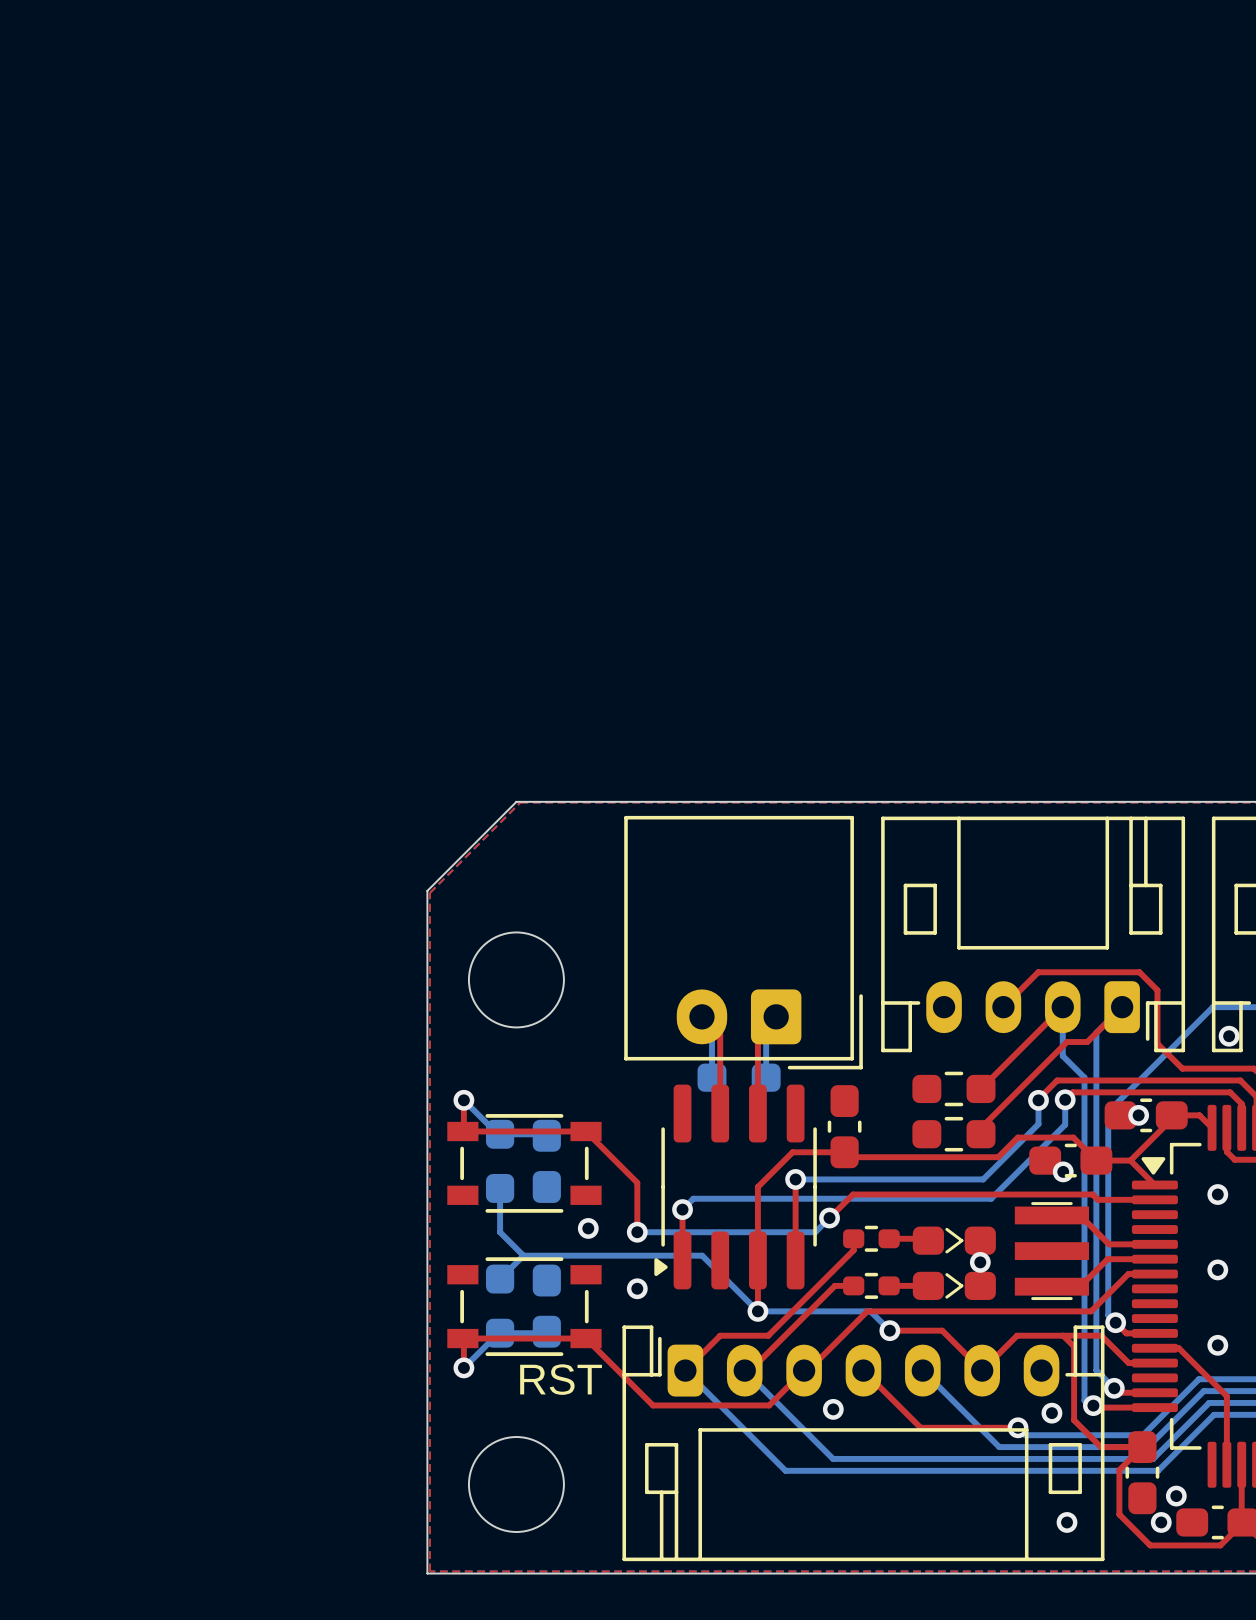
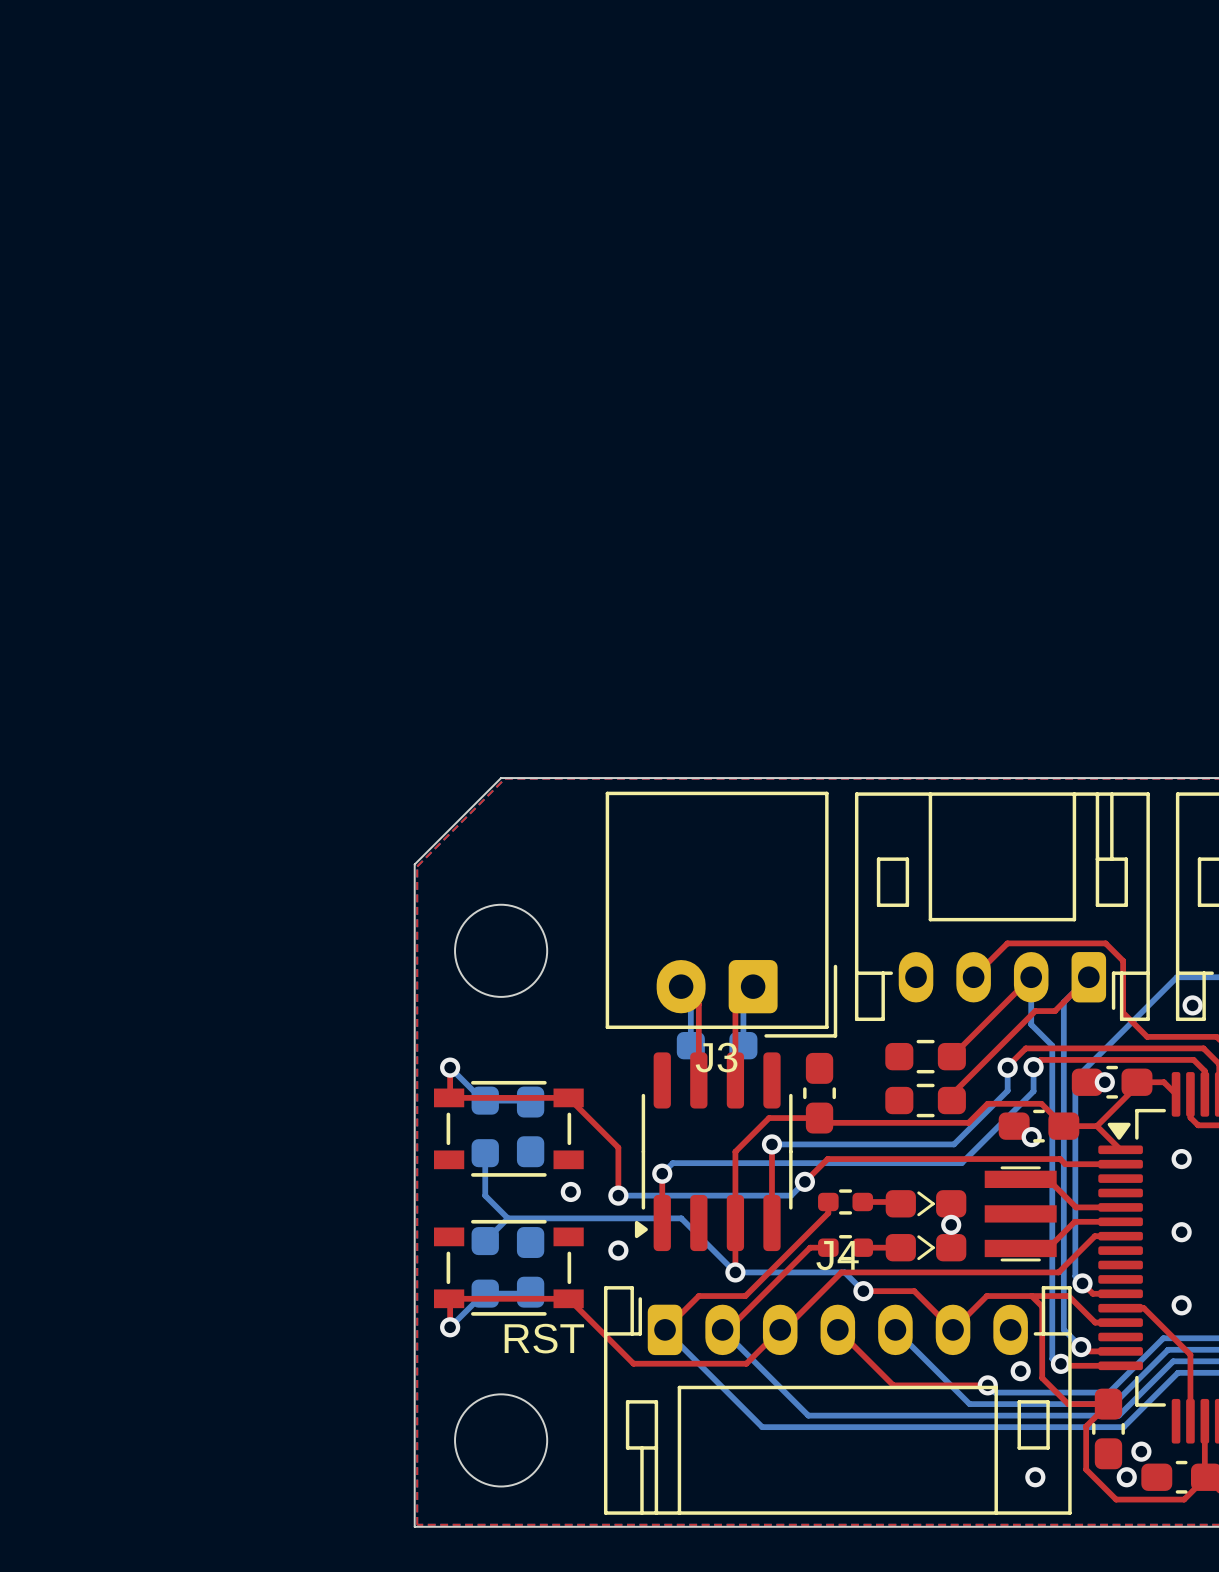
J3 name: none -> J3 (716, 1057)
J4 name: none -> J4 (837, 1255)
via: (833, 1409) -> none

